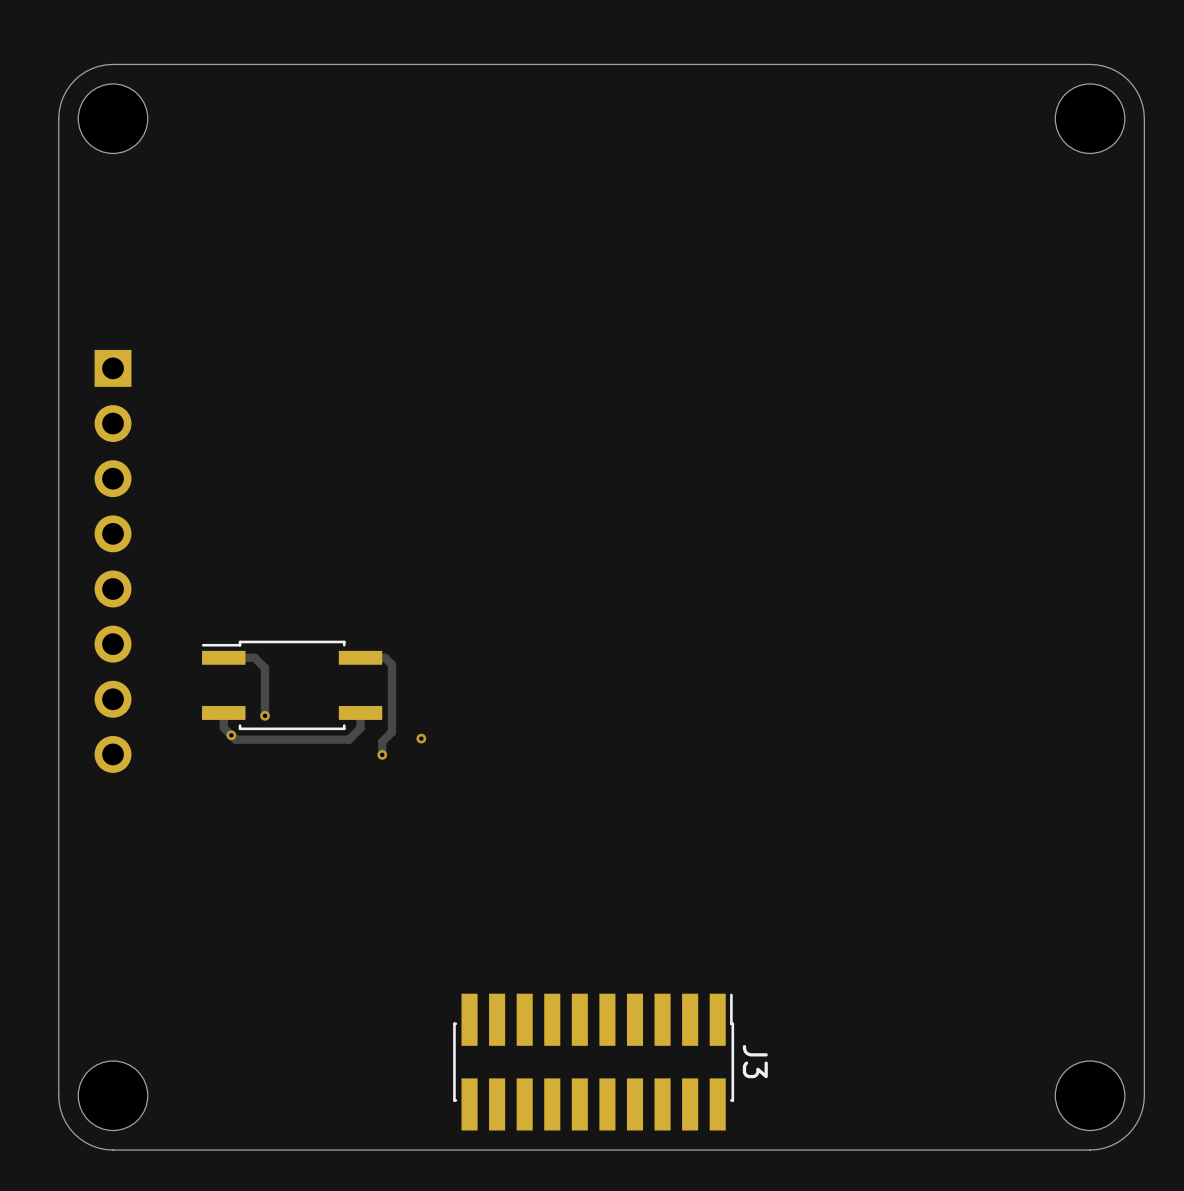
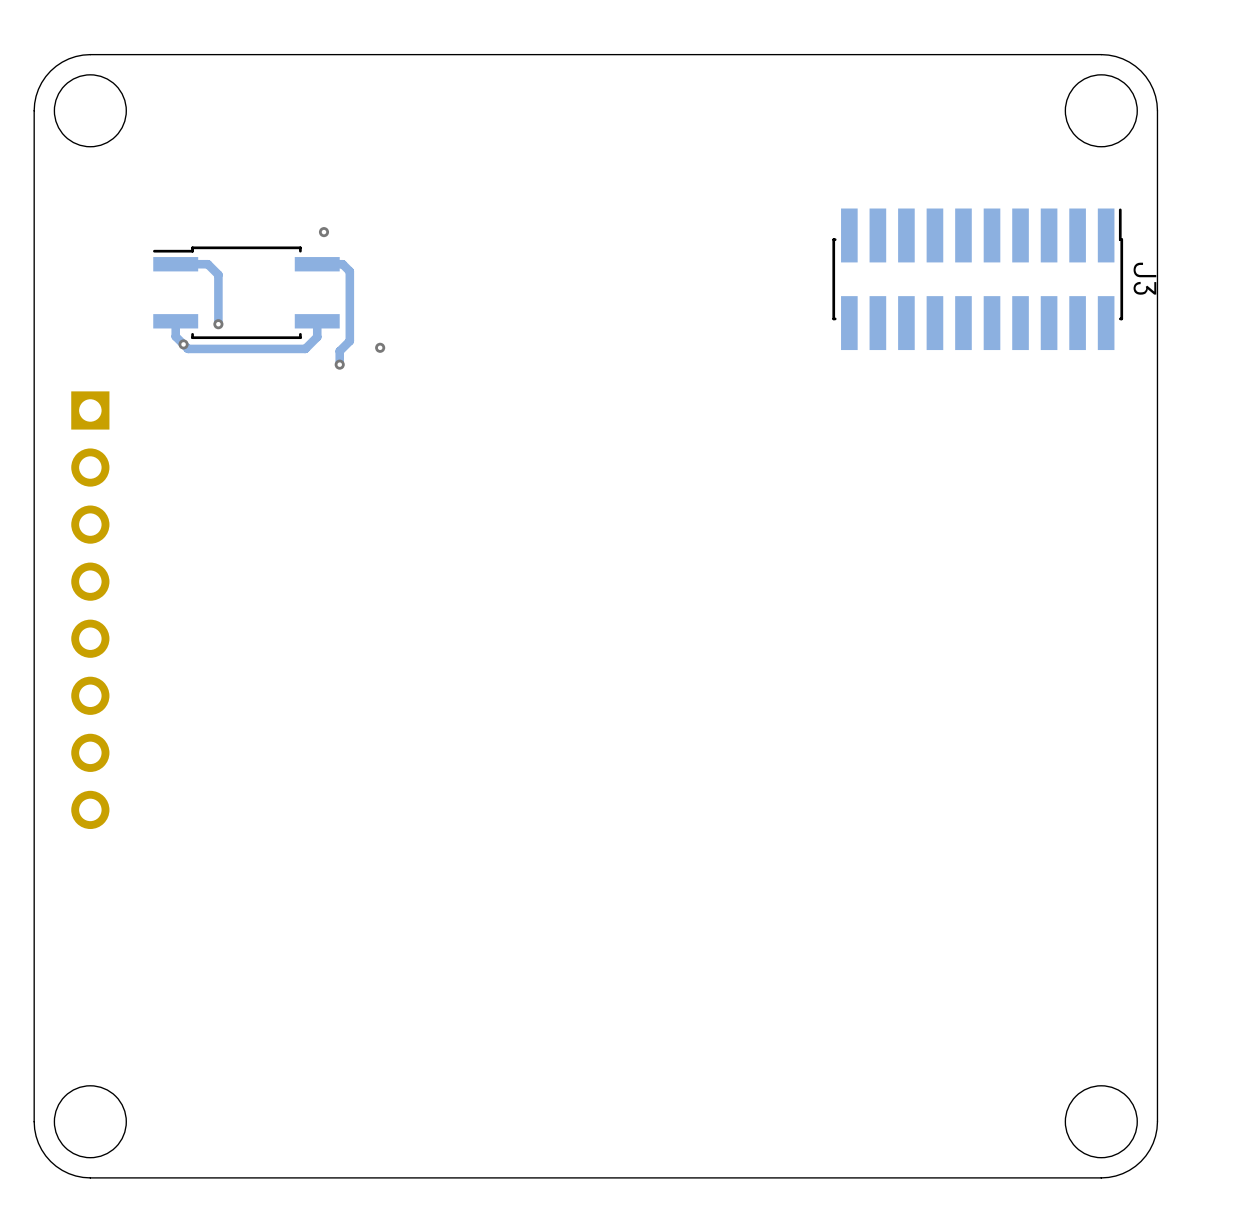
via: none -> (323, 232)
via: none -> (218, 324)
via: none -> (183, 344)
via: none -> (380, 347)
via: none -> (339, 364)
part position: (113, 561) -> (90, 610)
track: (223, 657) (254, 657) (265, 668) (265, 715) -> (175, 264) (207, 264) (218, 274) (218, 324)
track: (360, 657) (385, 657) (392, 664) (392, 732) (382, 741) (382, 754) -> (317, 264) (342, 264) (349, 271) (349, 341) (339, 351) (339, 364)
part position: (292, 685) -> (246, 292)
track: (360, 712) (360, 728) (349, 739) (235, 739) (223, 727) (223, 712) -> (317, 321) (317, 337) (305, 348) (188, 348) (175, 336) (175, 321)
via: (265, 715) -> none
via: (231, 735) -> none
via: (421, 738) -> none
via: (382, 754) -> none
J3 position: (593, 1062) -> (977, 279)

